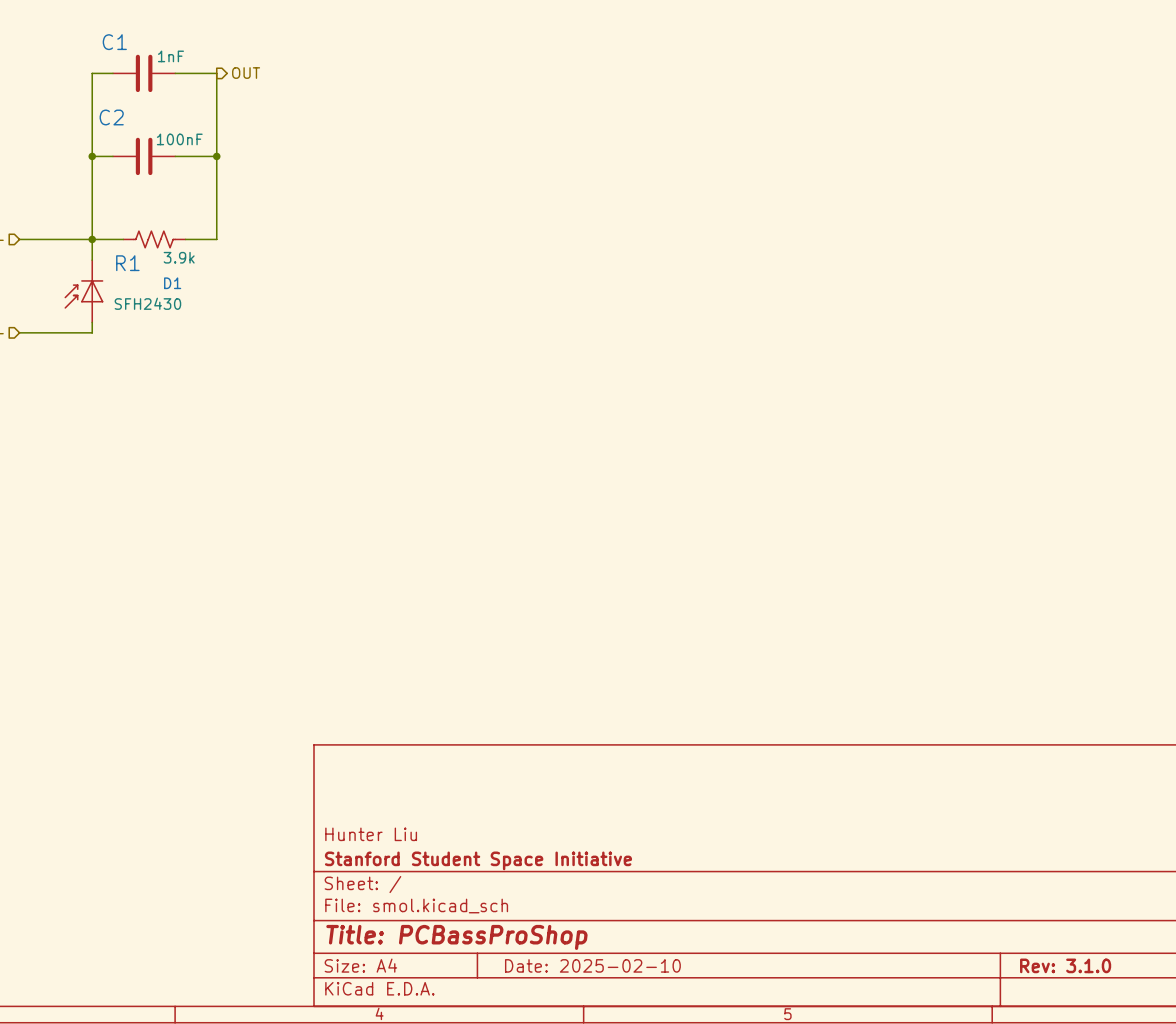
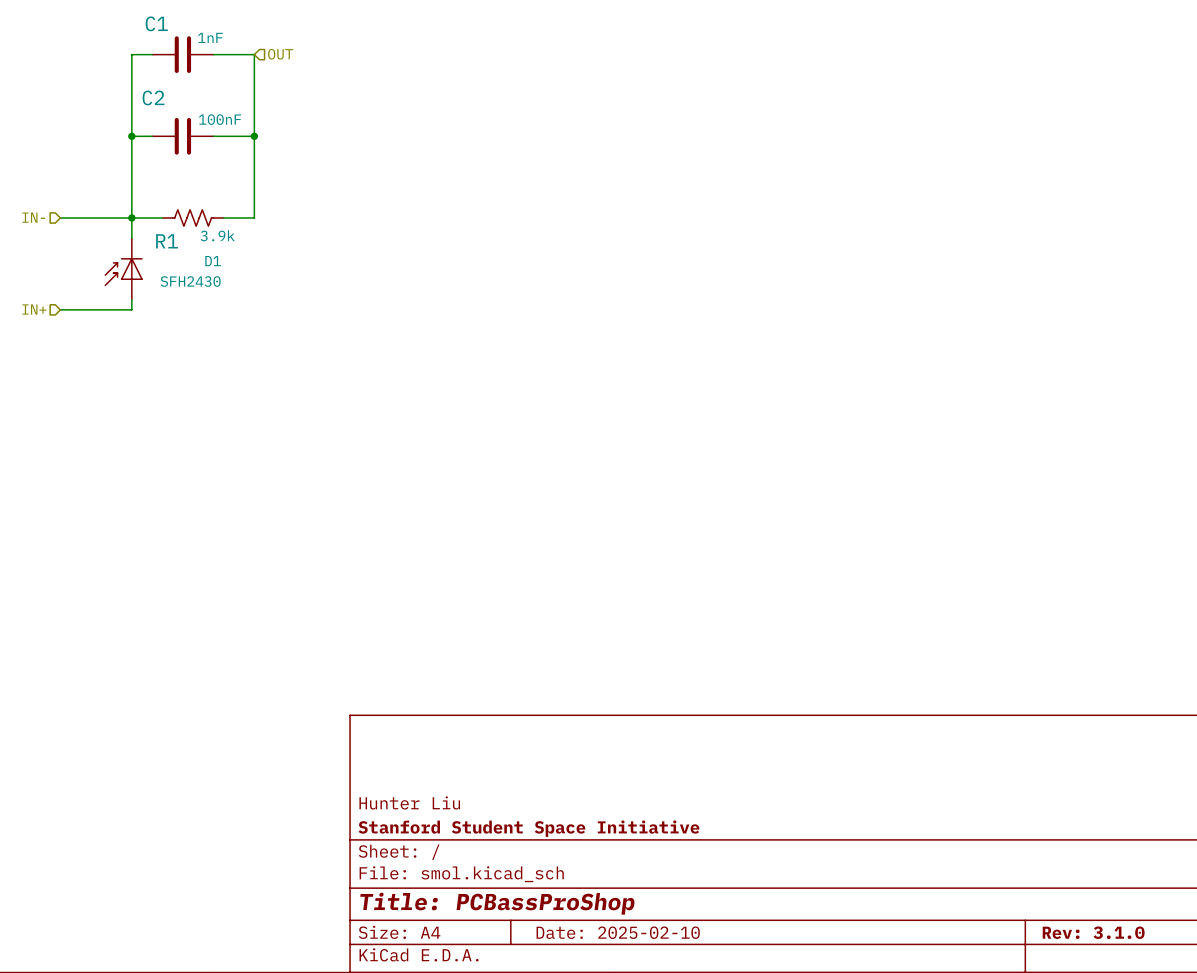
hierarchical label shape: output (246, 73) -> input (280, 54)

